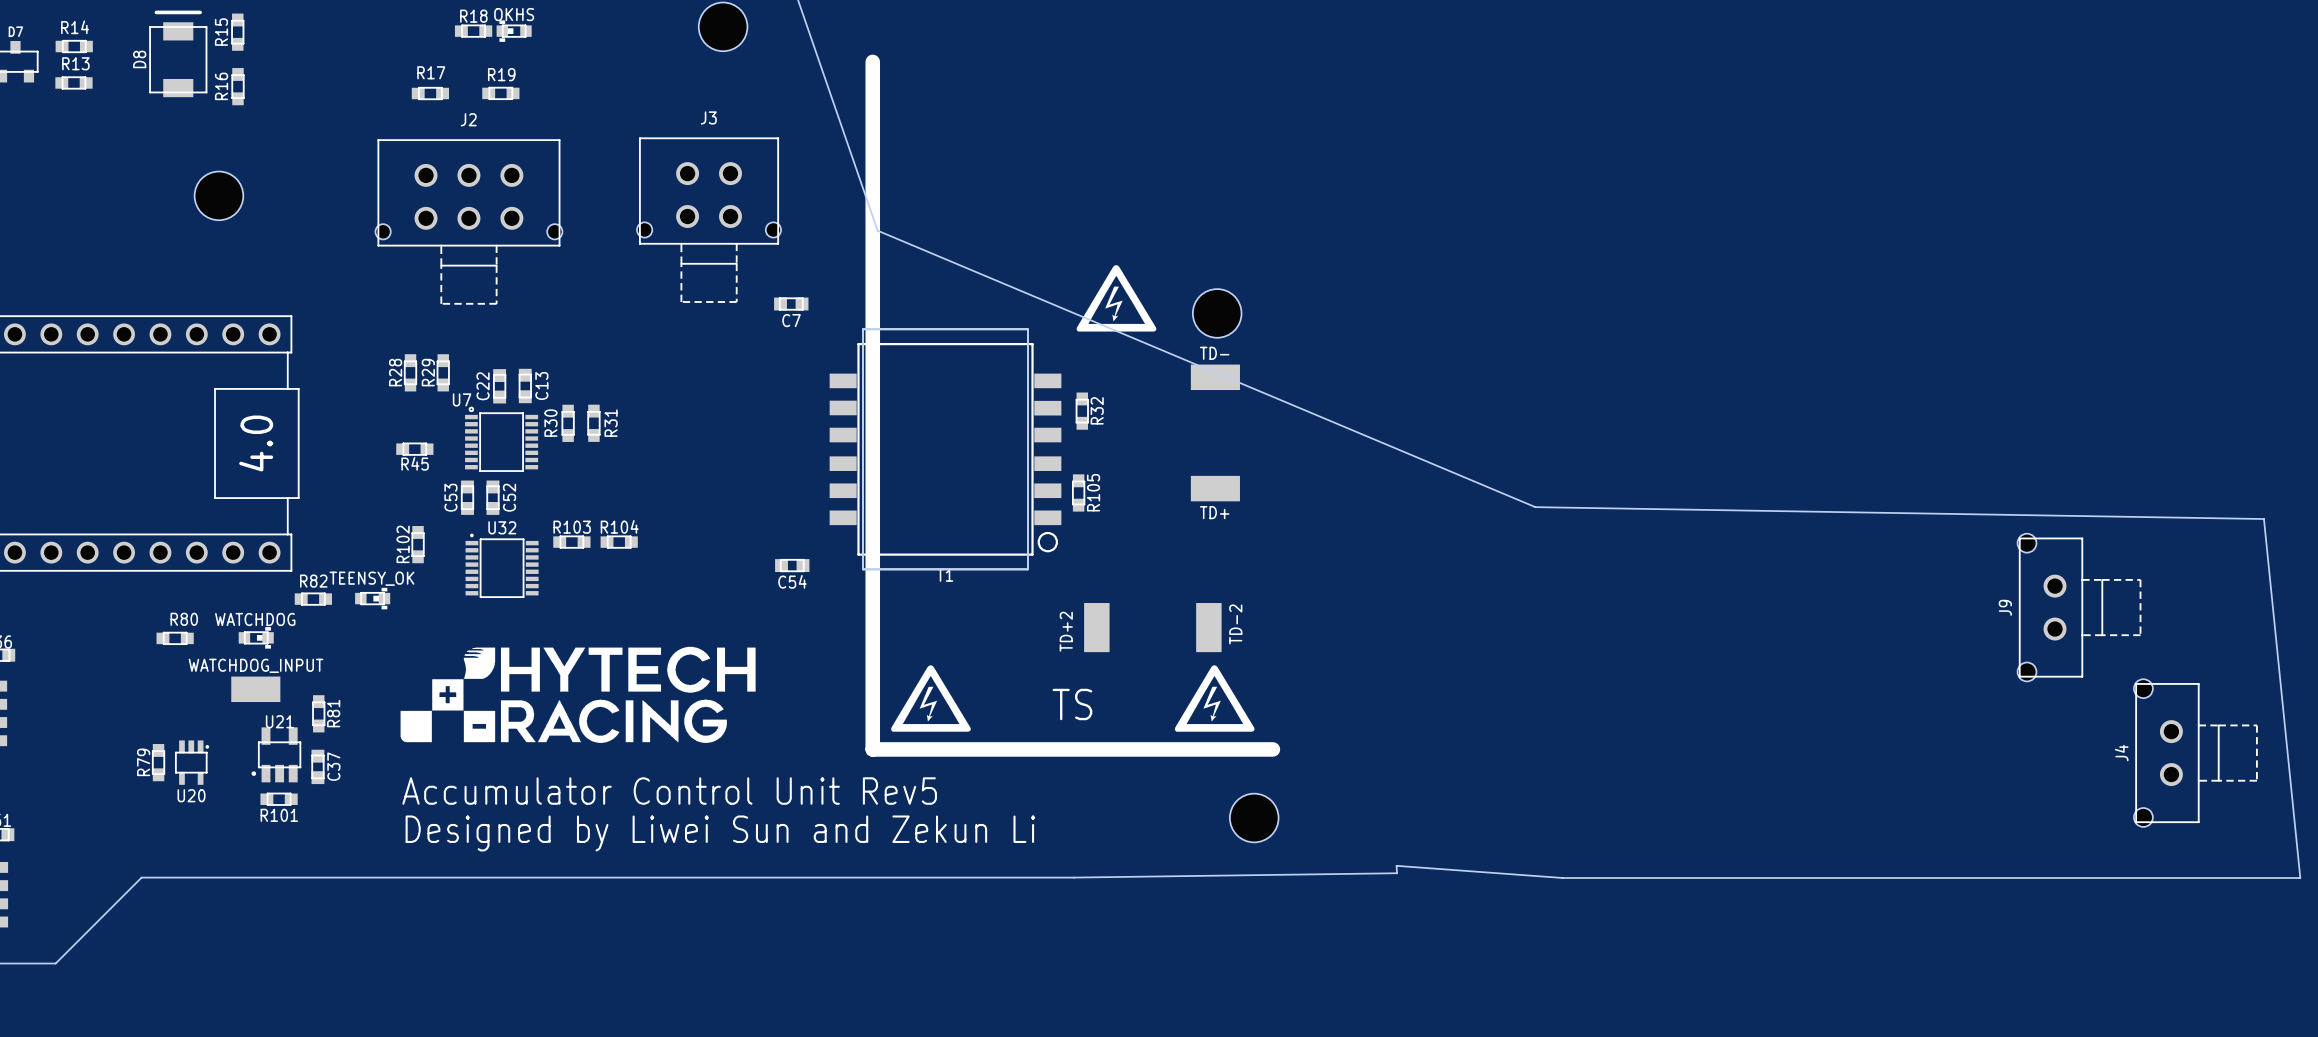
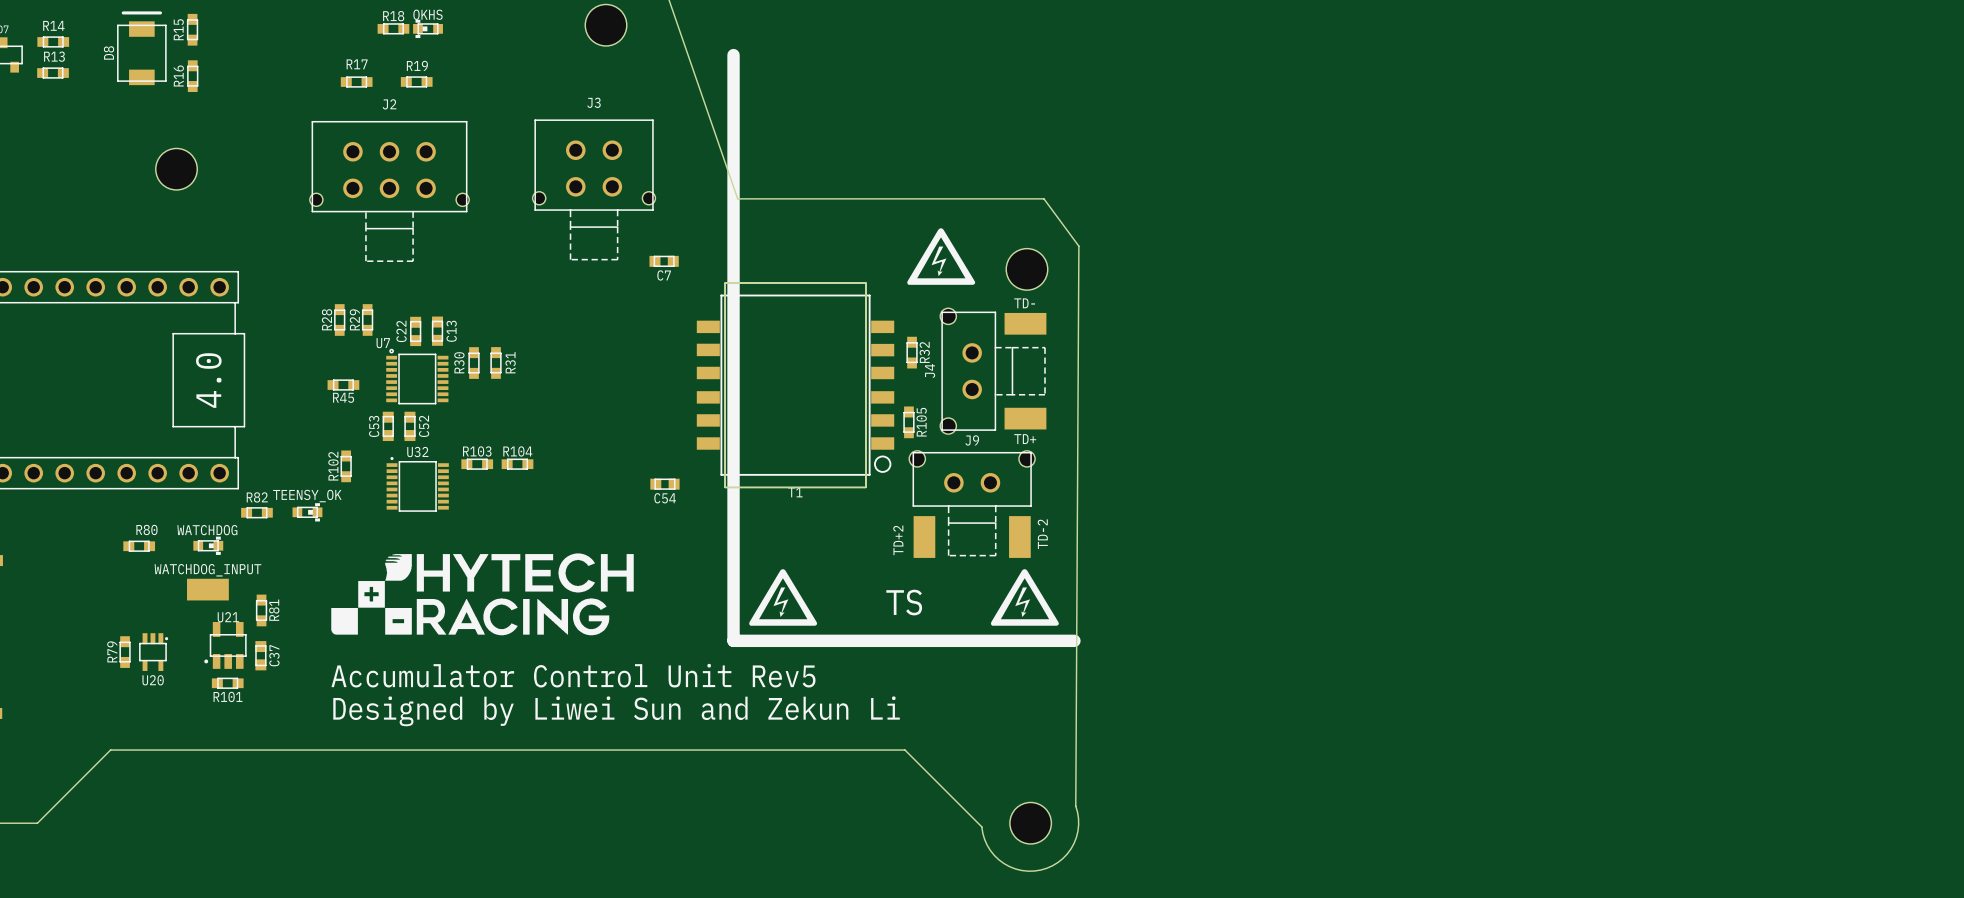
board edge: (877, 230) (1535, 507) (2263, 519) (2300, 877) (1562, 877) (1396, 865) (1397, 873) (1073, 877) -> (737, 198) (1043, 198) (1078, 246) (1075, 806) (1078, 824) (1076, 837) (1071, 848) (1057, 862) (1040, 870) (1021, 870) (1004, 863) (990, 850) (984, 839) (981, 826) (904, 750)
J9 rotation: 0° (2079, 607) -> 90° clockwise (972, 503)
J9 position: (2079, 607) -> (972, 503)
J4 position: (2195, 753) -> (993, 371)
part position: (1254, 818) -> (1030, 823)

